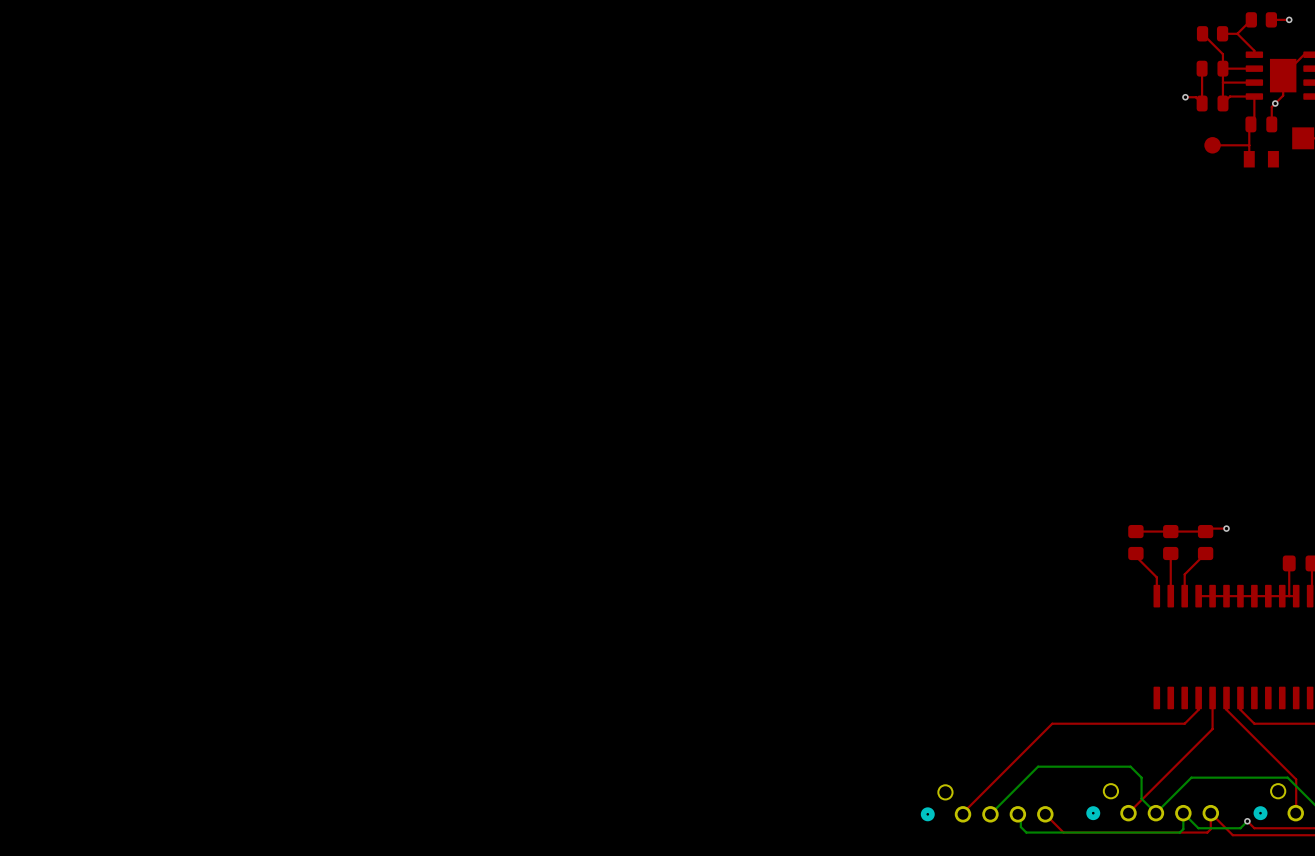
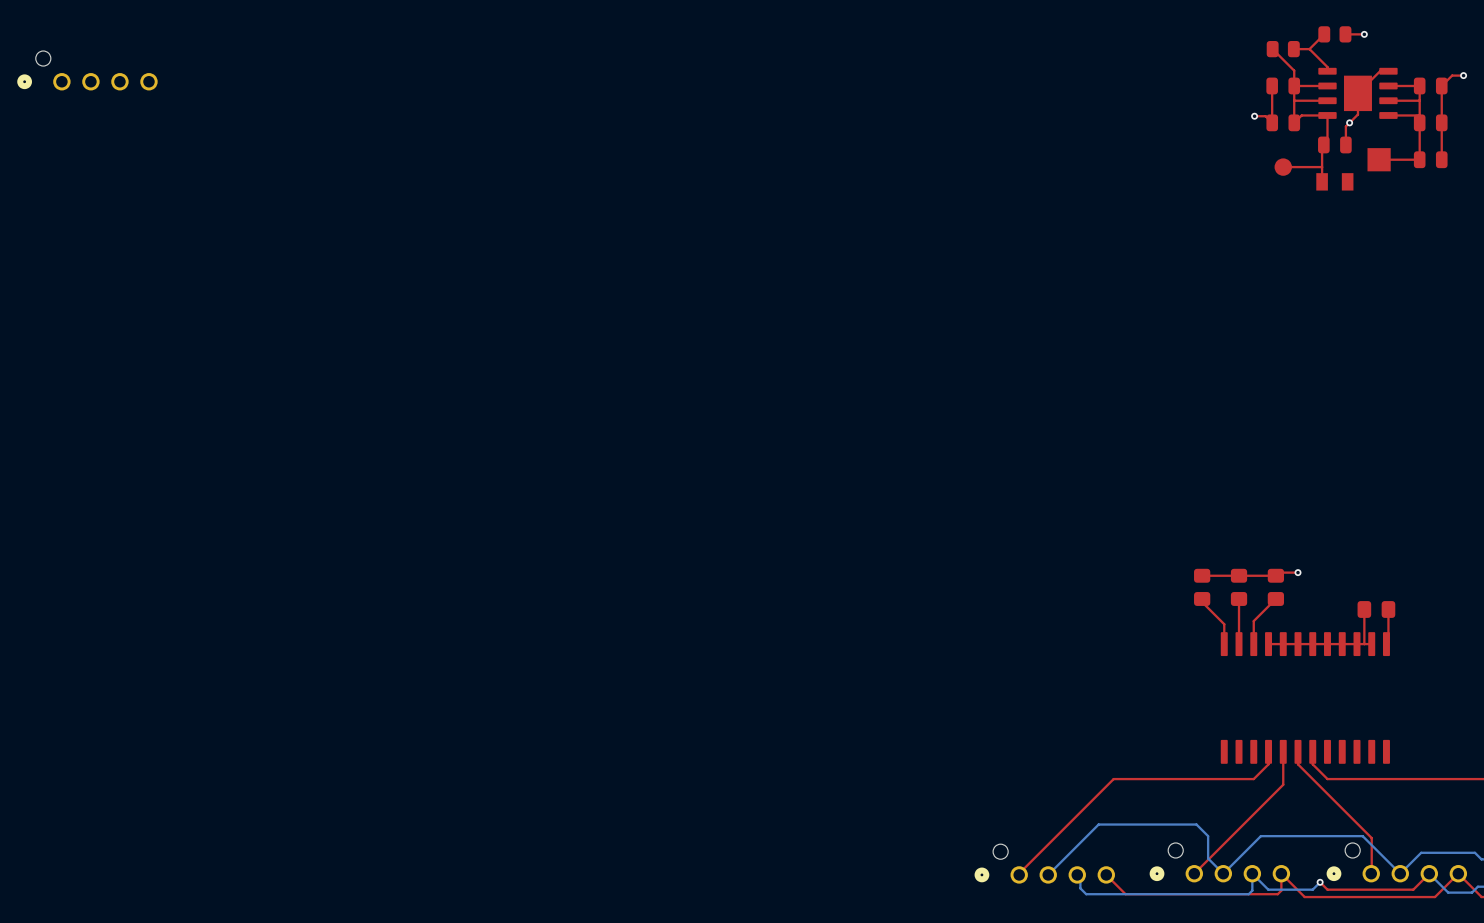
part: none -> (87, 70)

